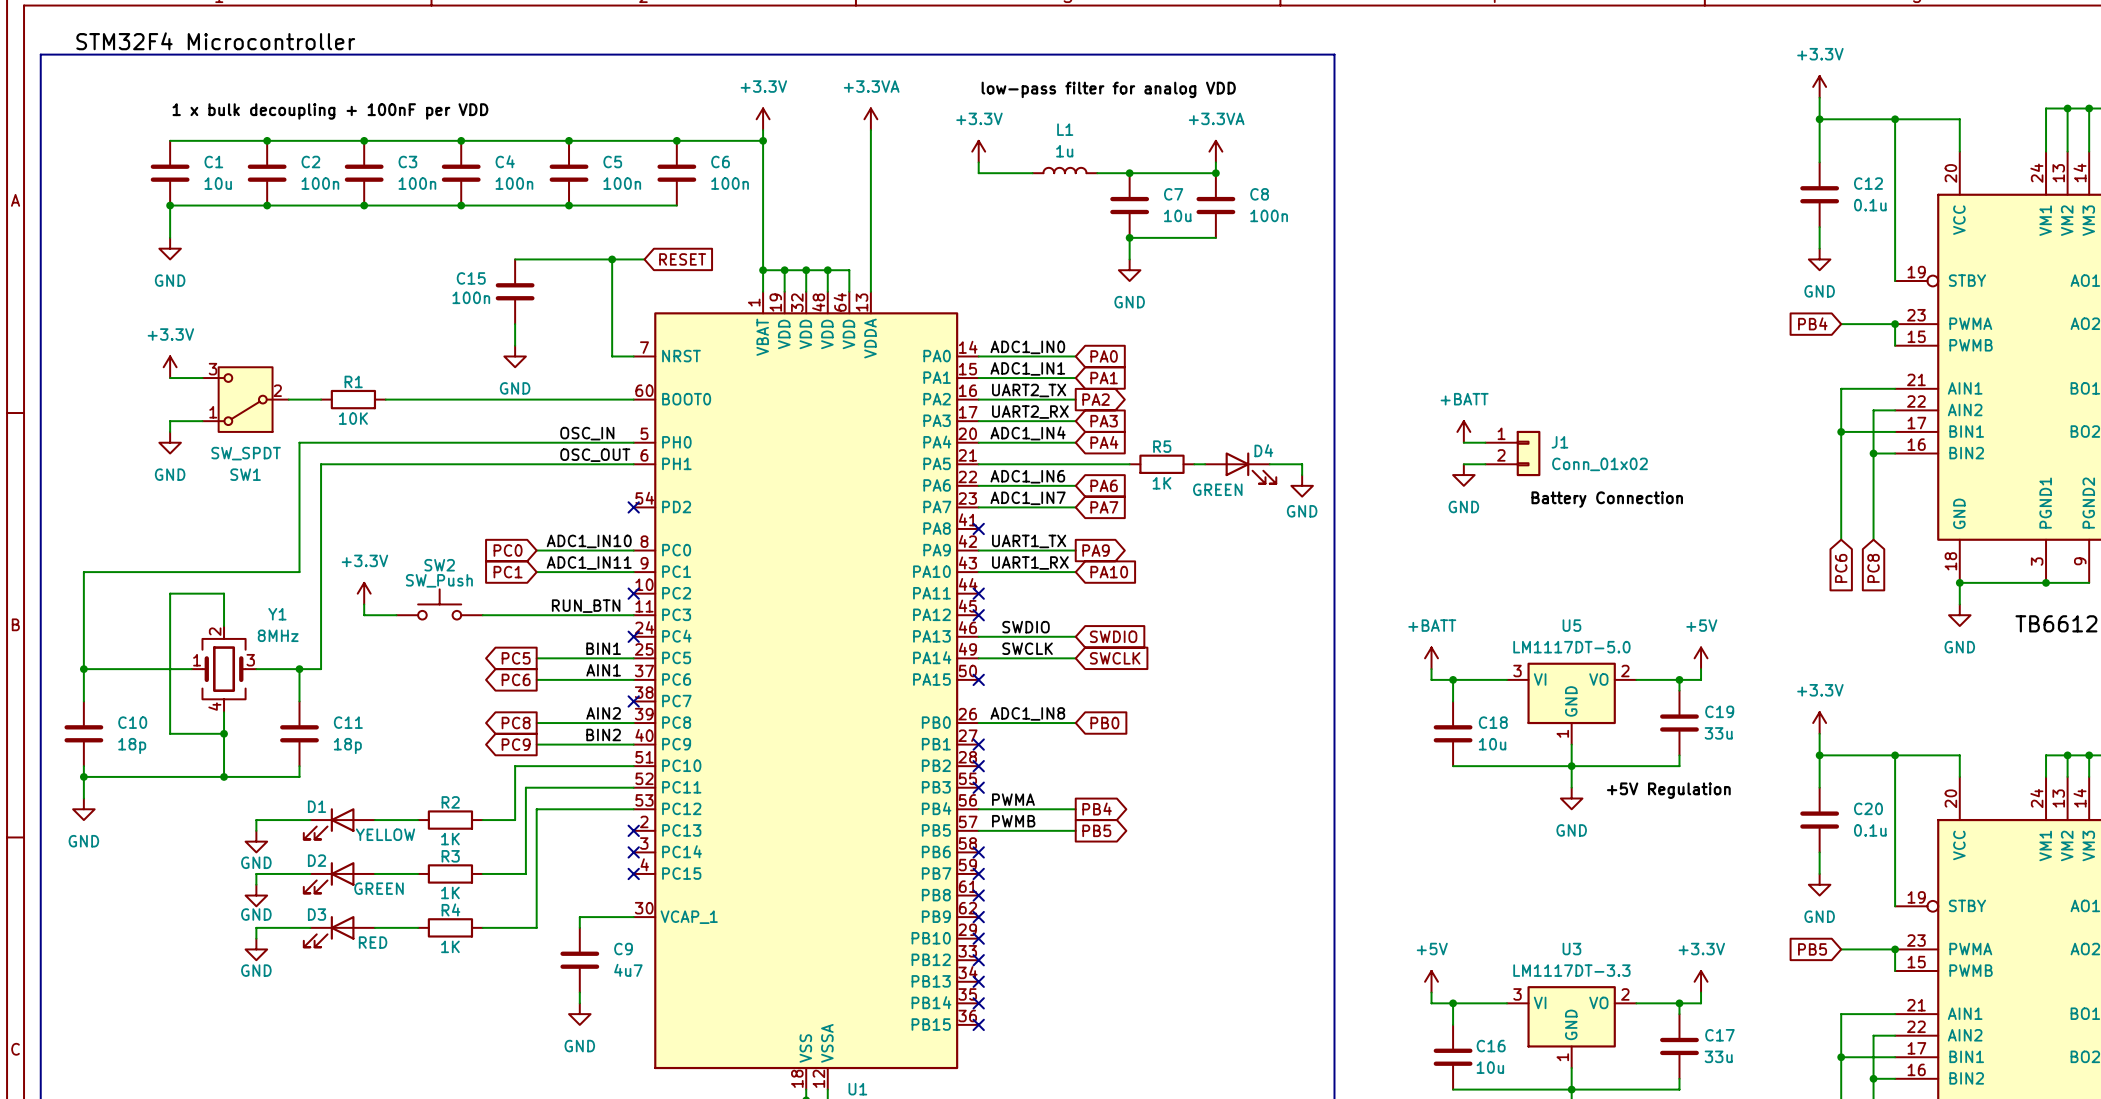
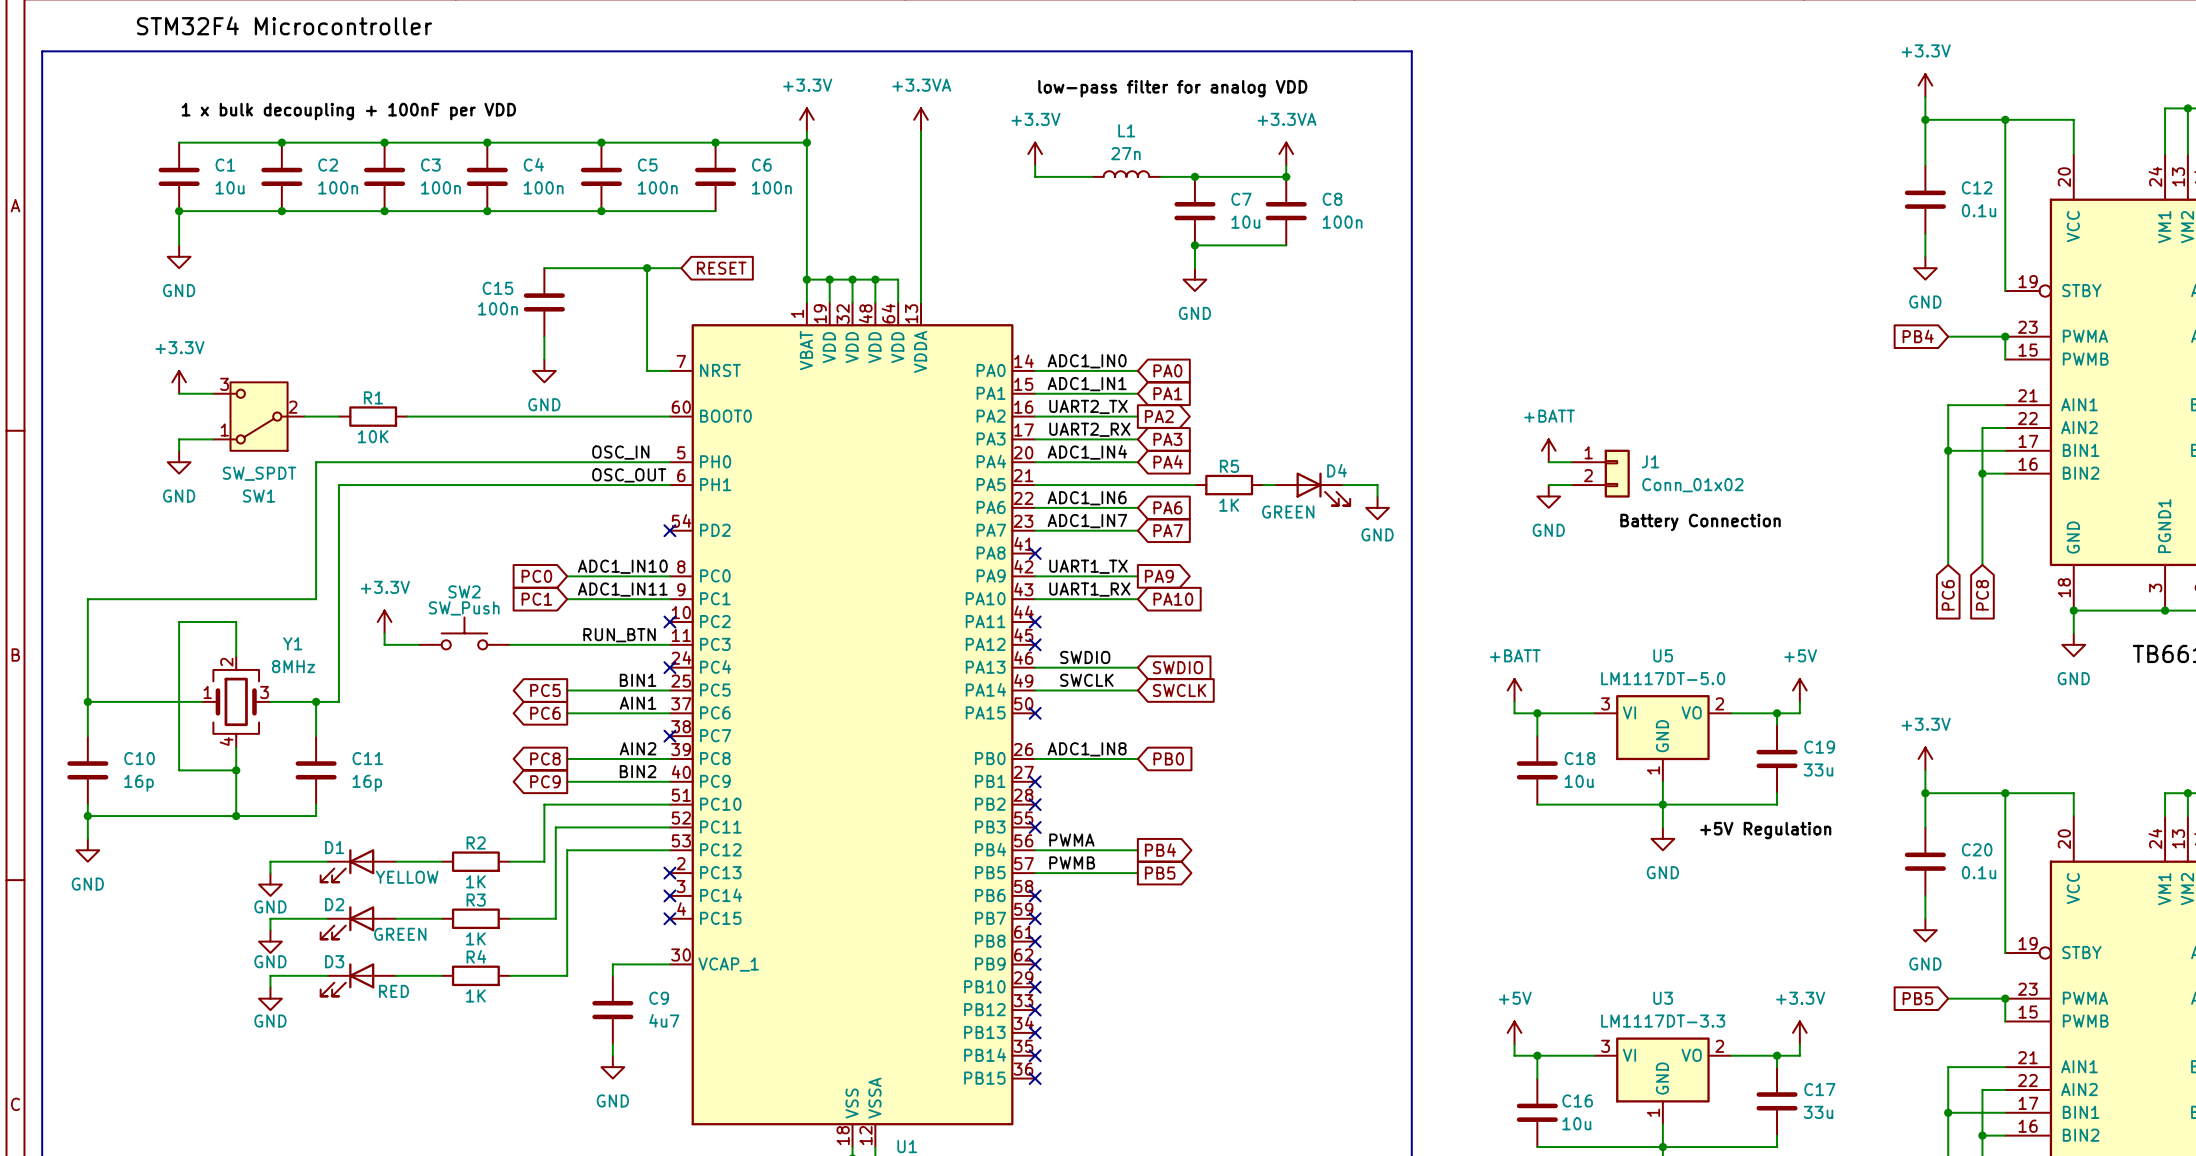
label position: STM32F4 Microcontroller (215, 41) -> STM32F4 Microcontroller (284, 25)
L1 value: 1u (1064, 151) -> 27n (1125, 153)
C10 value: 18p (132, 745) -> 16p (139, 783)
C11 value: 18p (347, 745) -> 16p (367, 783)

